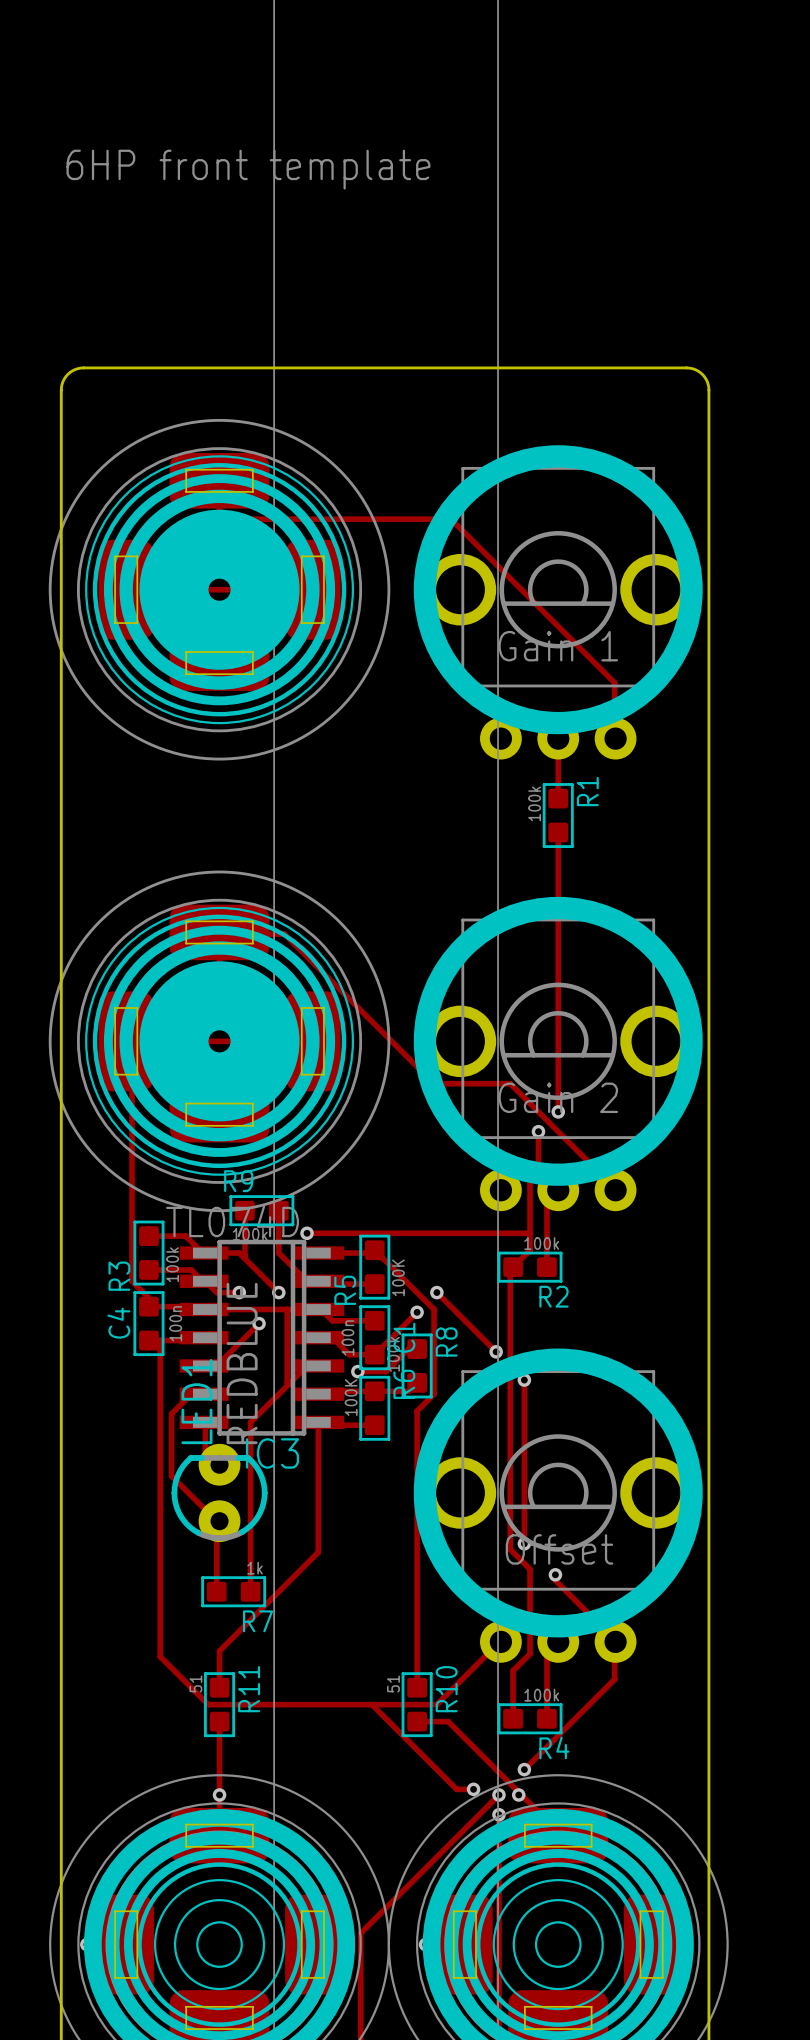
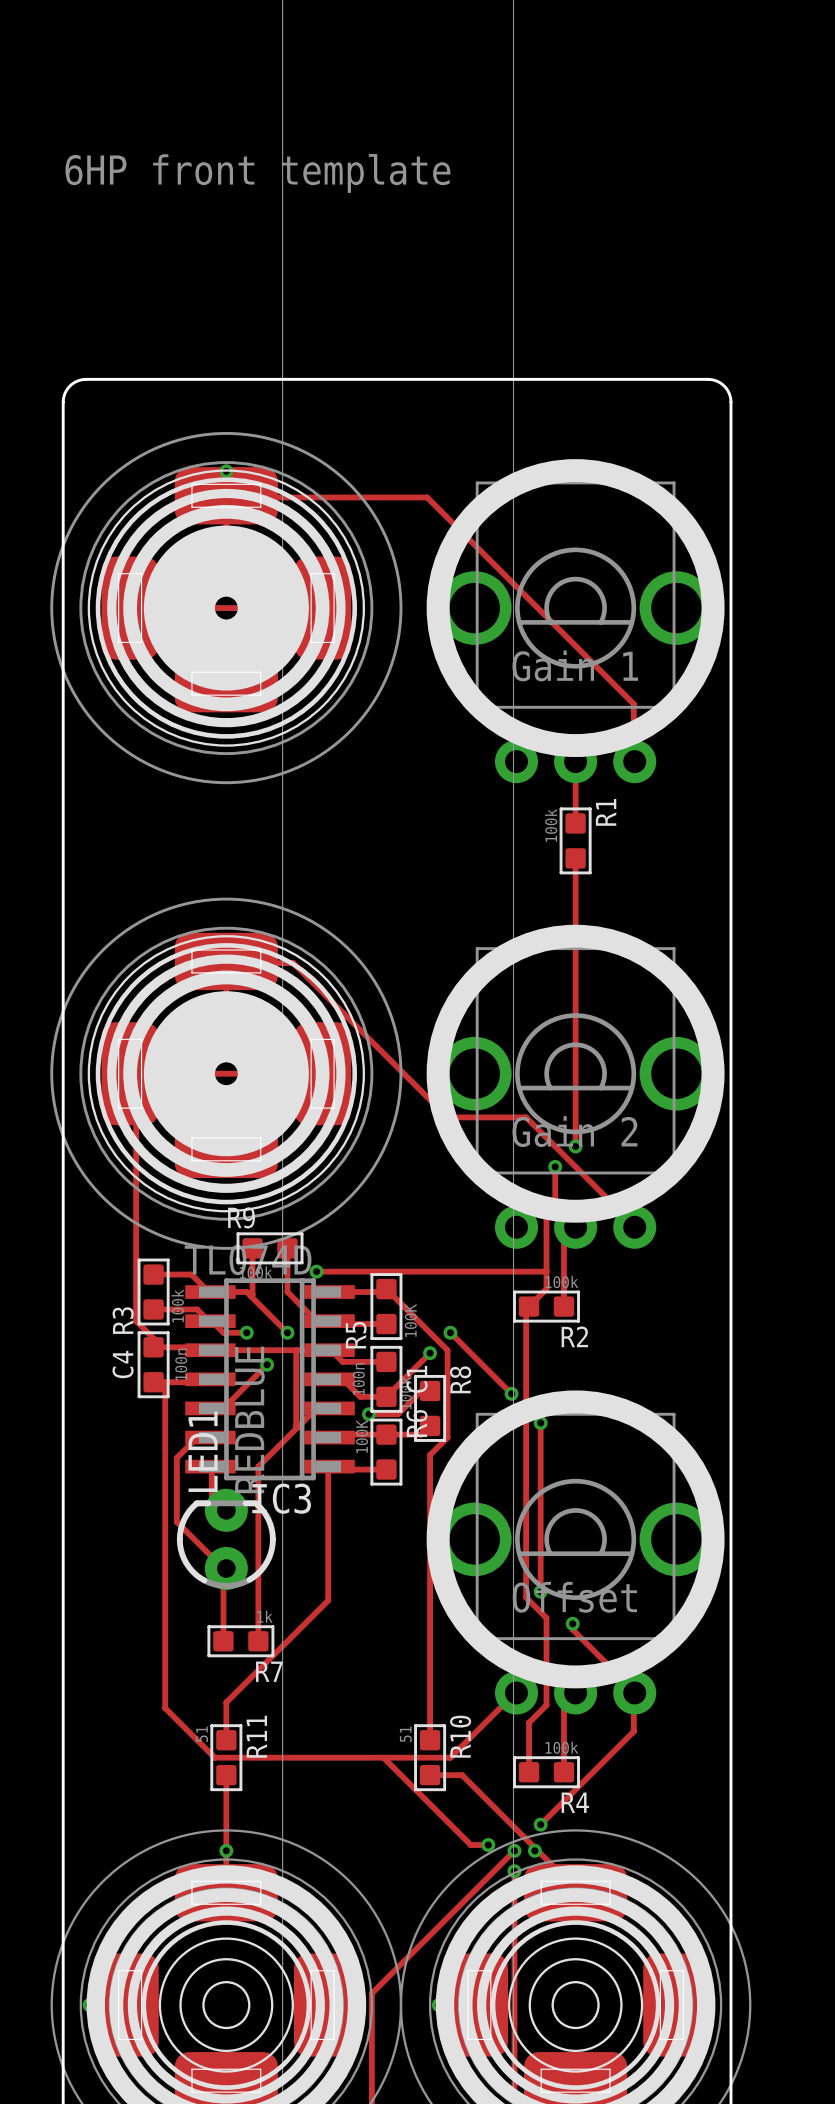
via: none -> (226, 471)
track: (219, 519) (450, 519) -> (226, 497) (427, 497) (465, 535)

